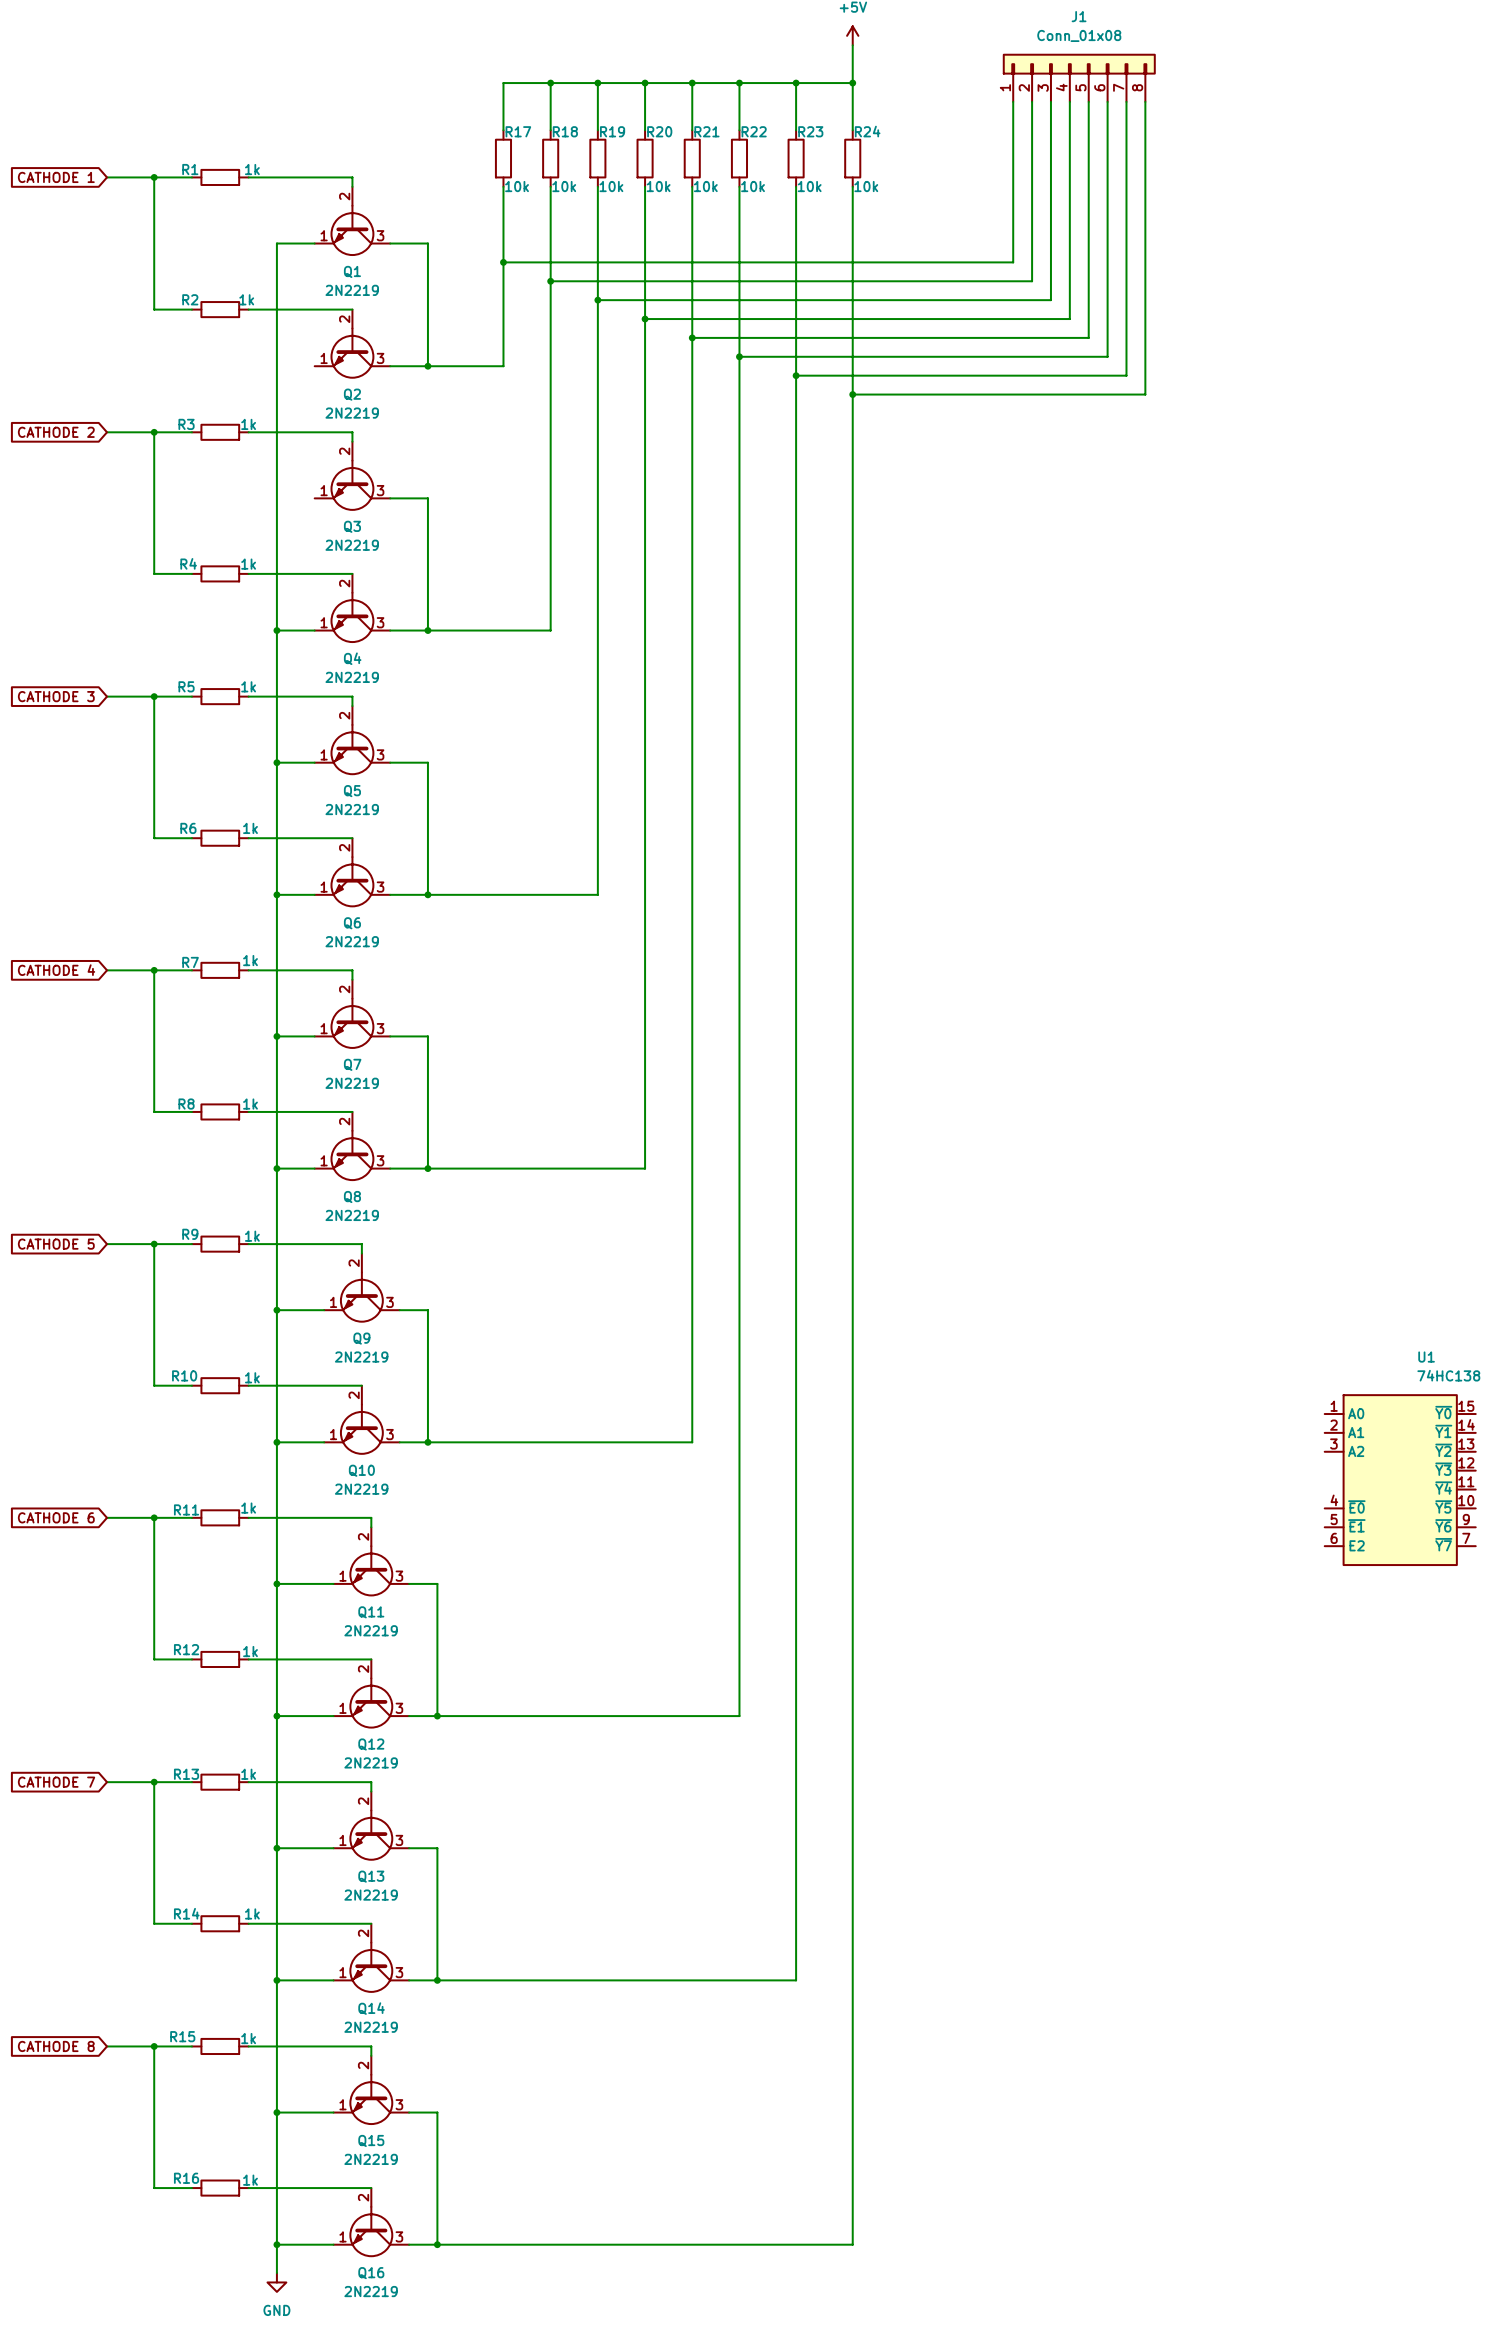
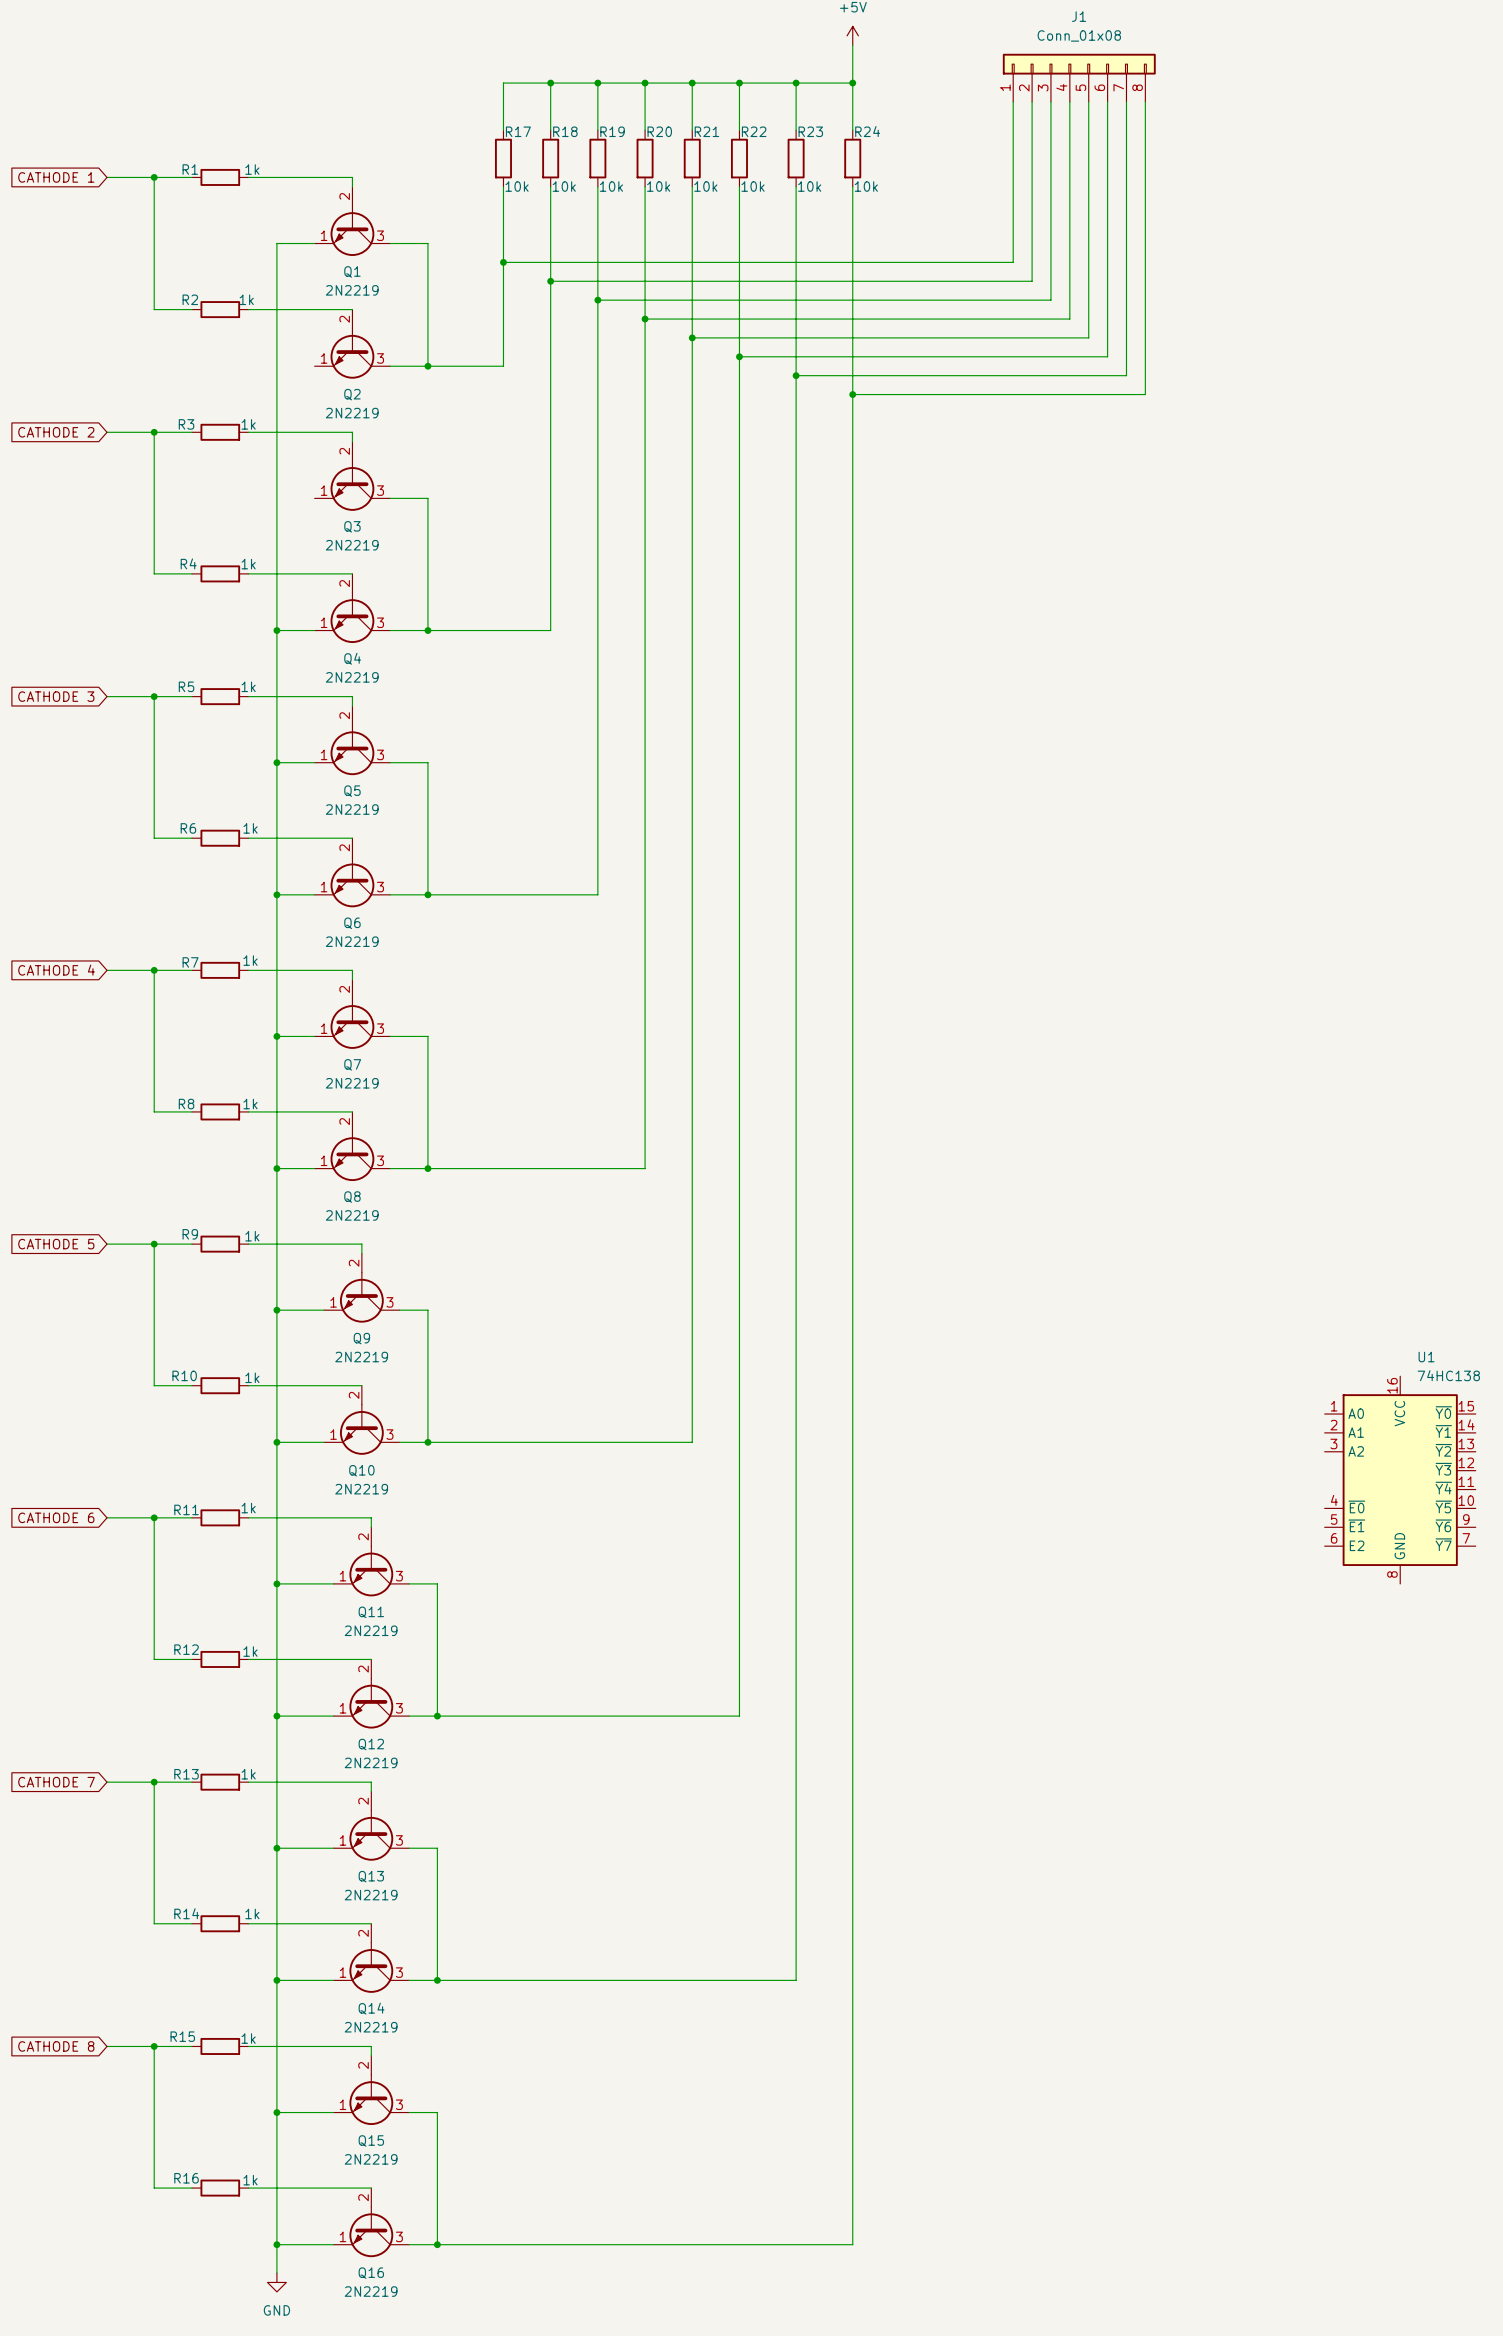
U1 symbol: [1324, 1394, 1476, 1566] -> [1324, 1376, 1476, 1584]

